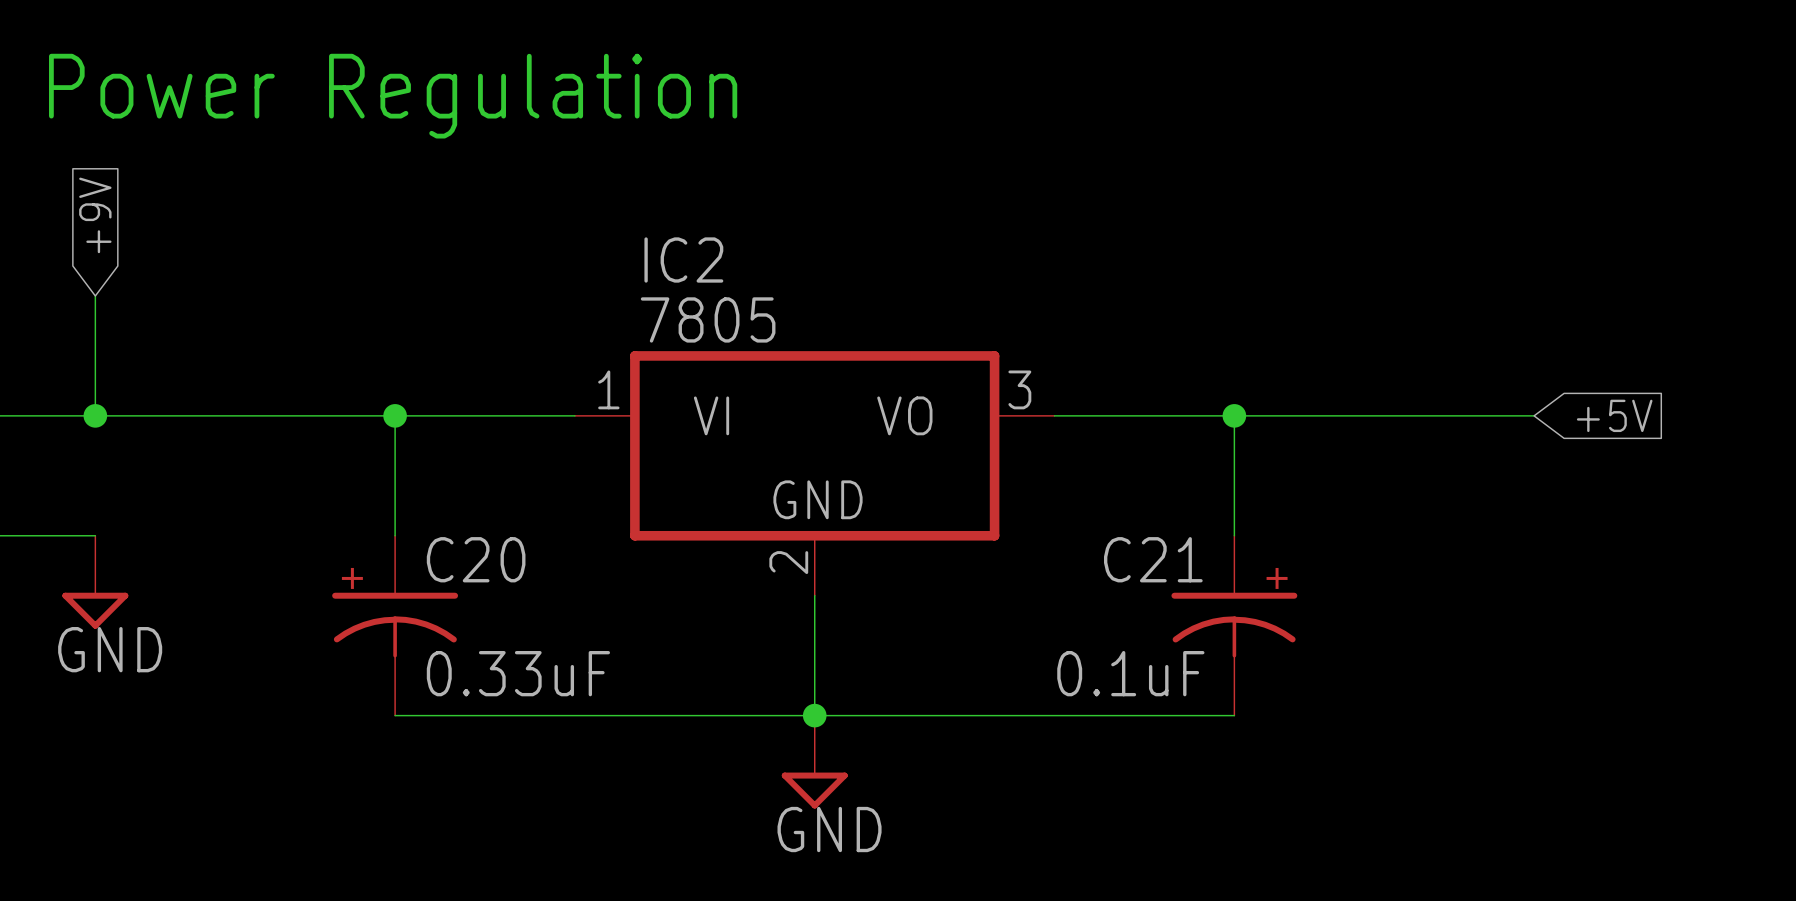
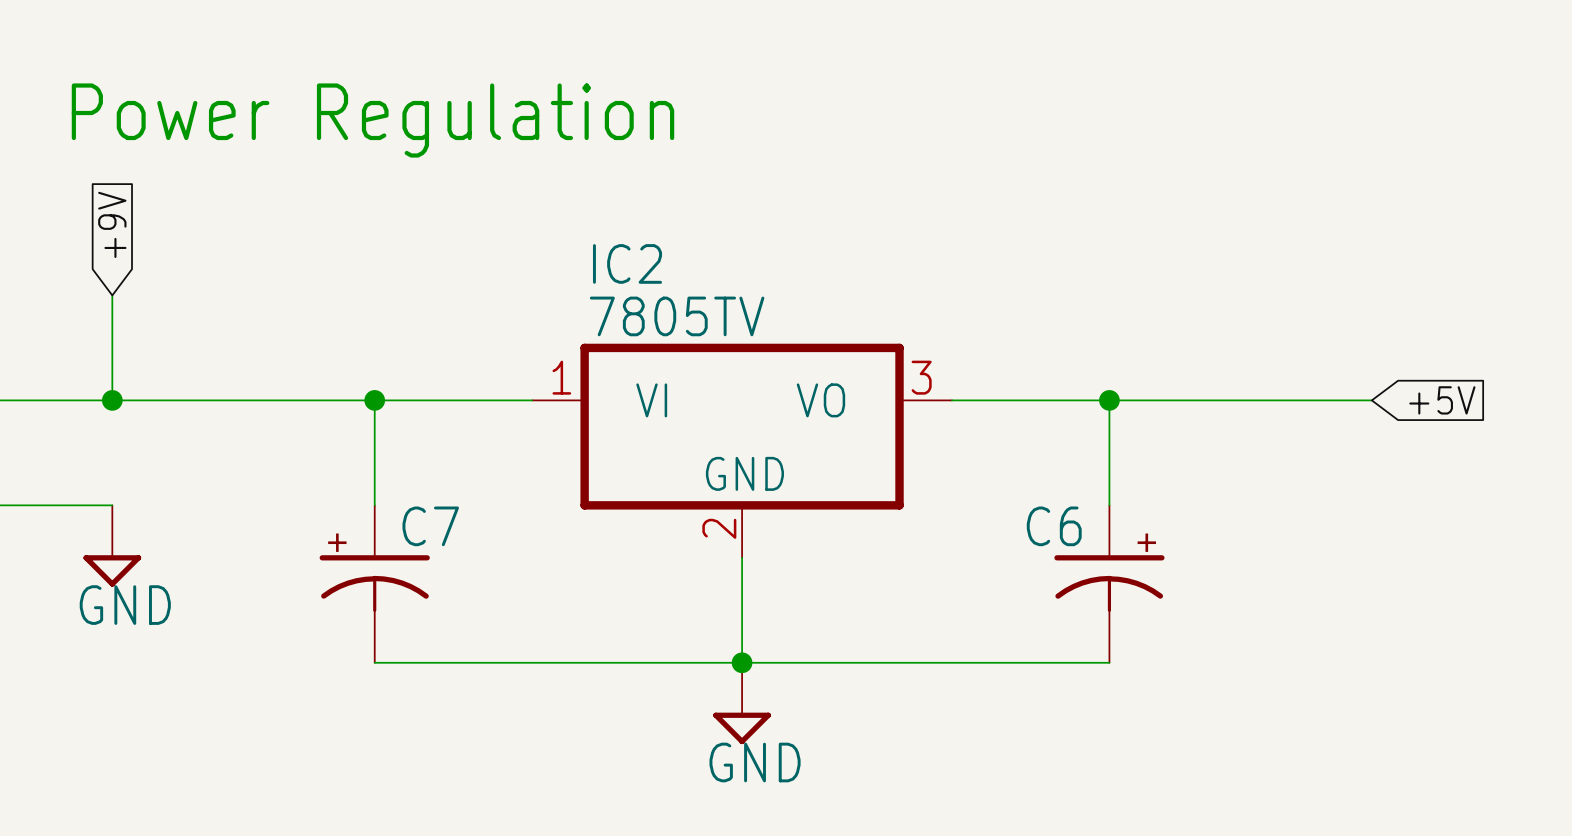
IC2 value: 7805 (708, 319) -> 7805TV (677, 316)
C20 name: C20 (476, 559) -> C7 (430, 526)
C21 name: C21 (1153, 559) -> C6 (1054, 526)
C20 value: 0.33uF (518, 673) -> none
C21 value: 0.1uF (1130, 673) -> none

